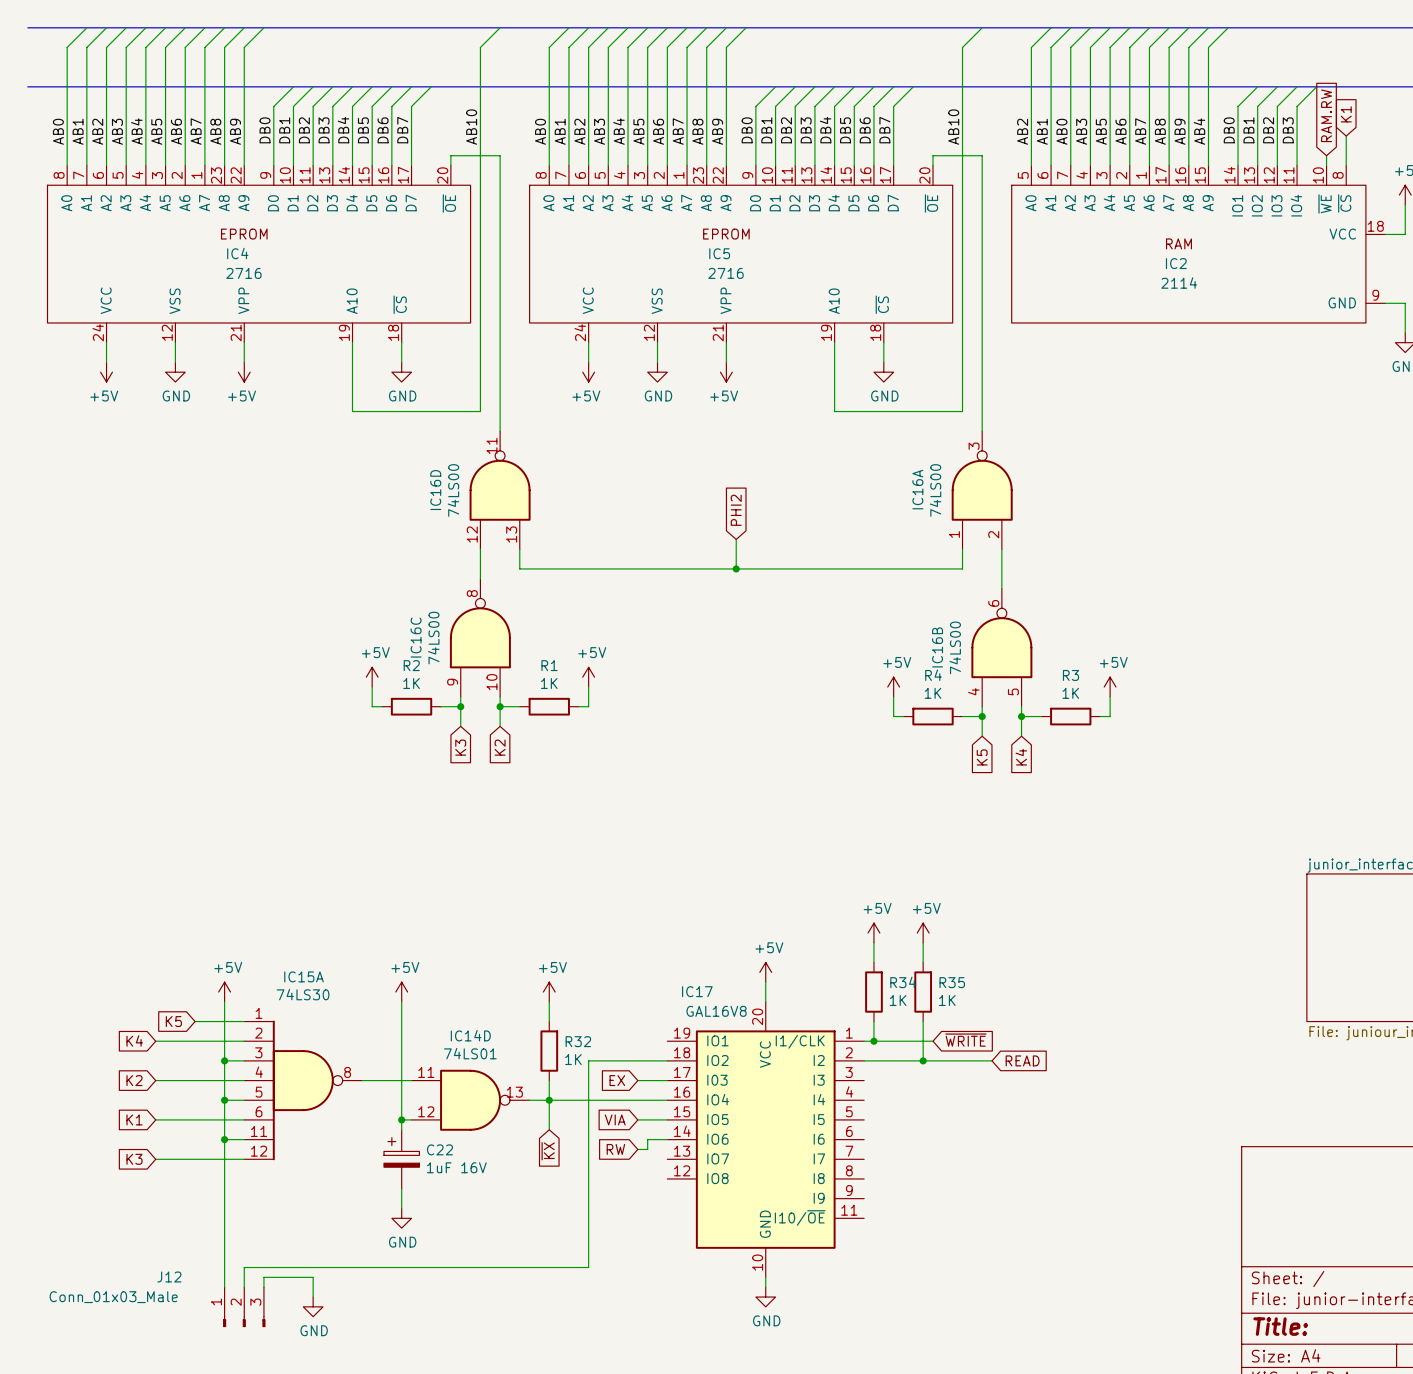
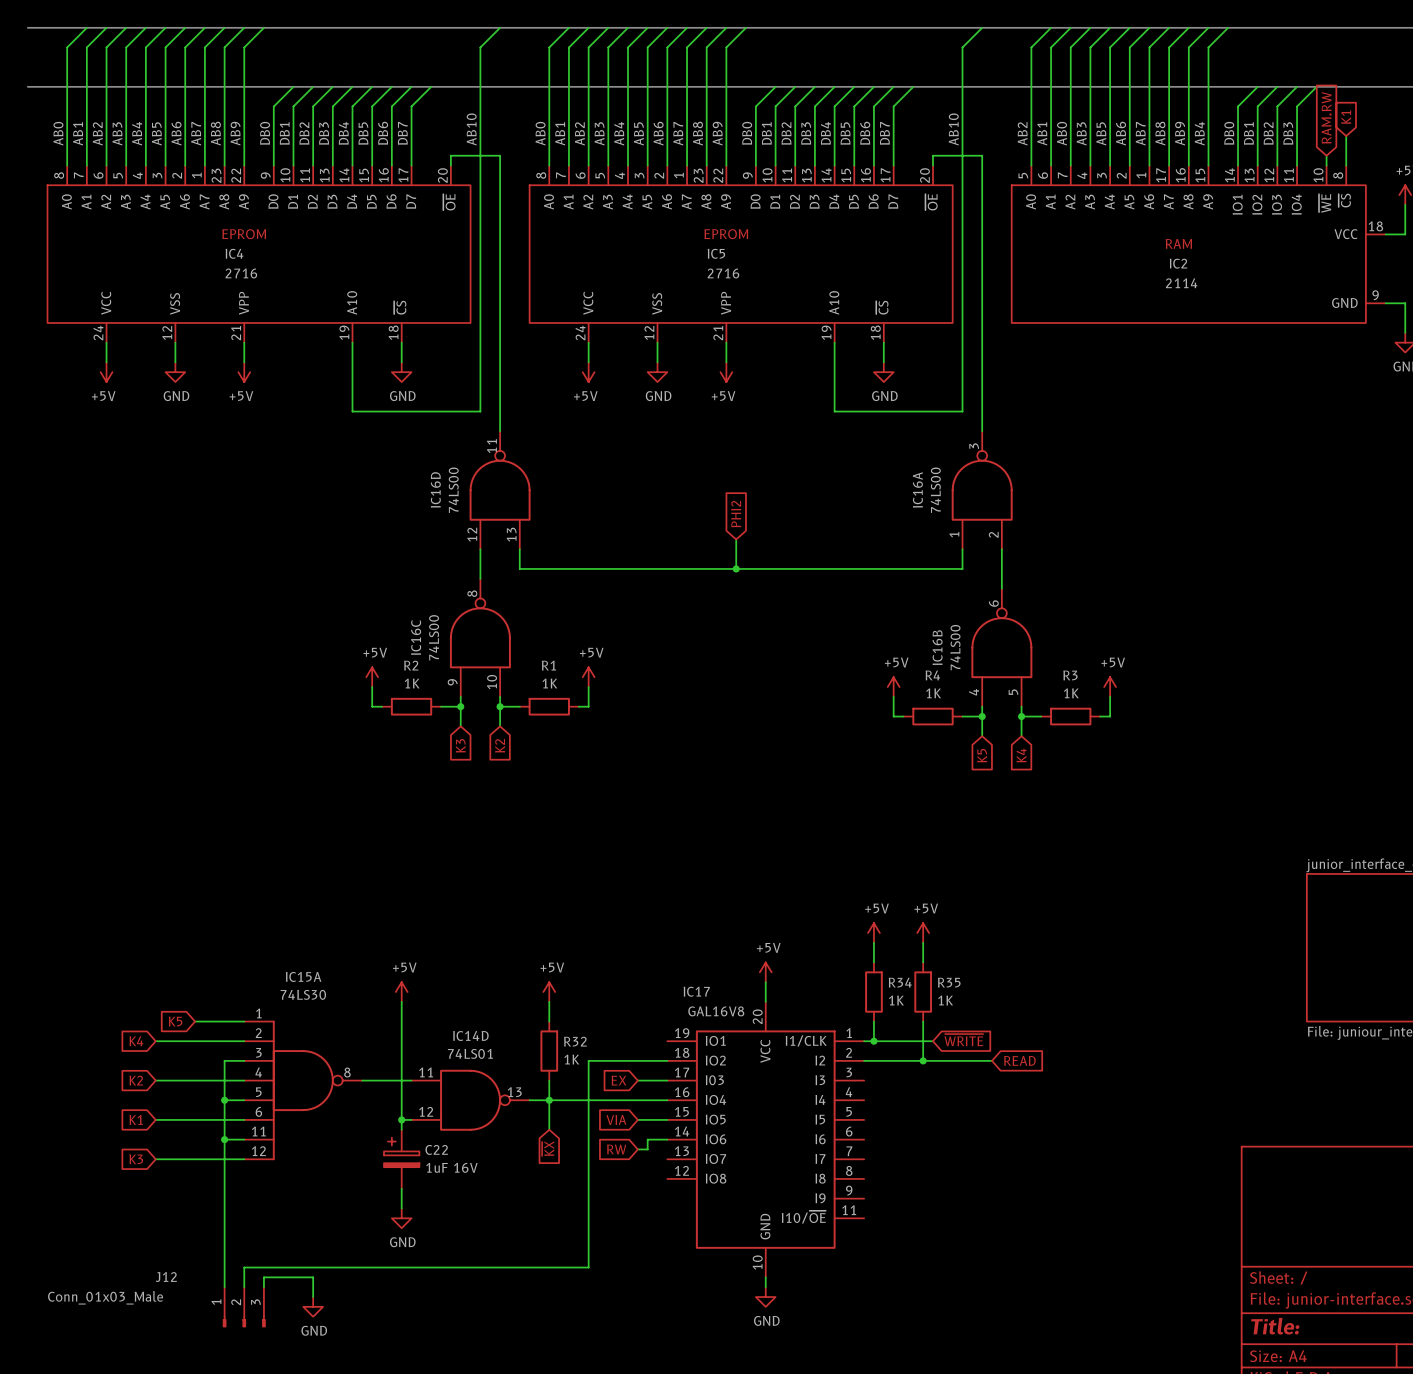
power symbol: +5V (224, 992) -> none
wire: (224, 1001) (224, 1060) -> none
junction: (224, 1060) -> none

